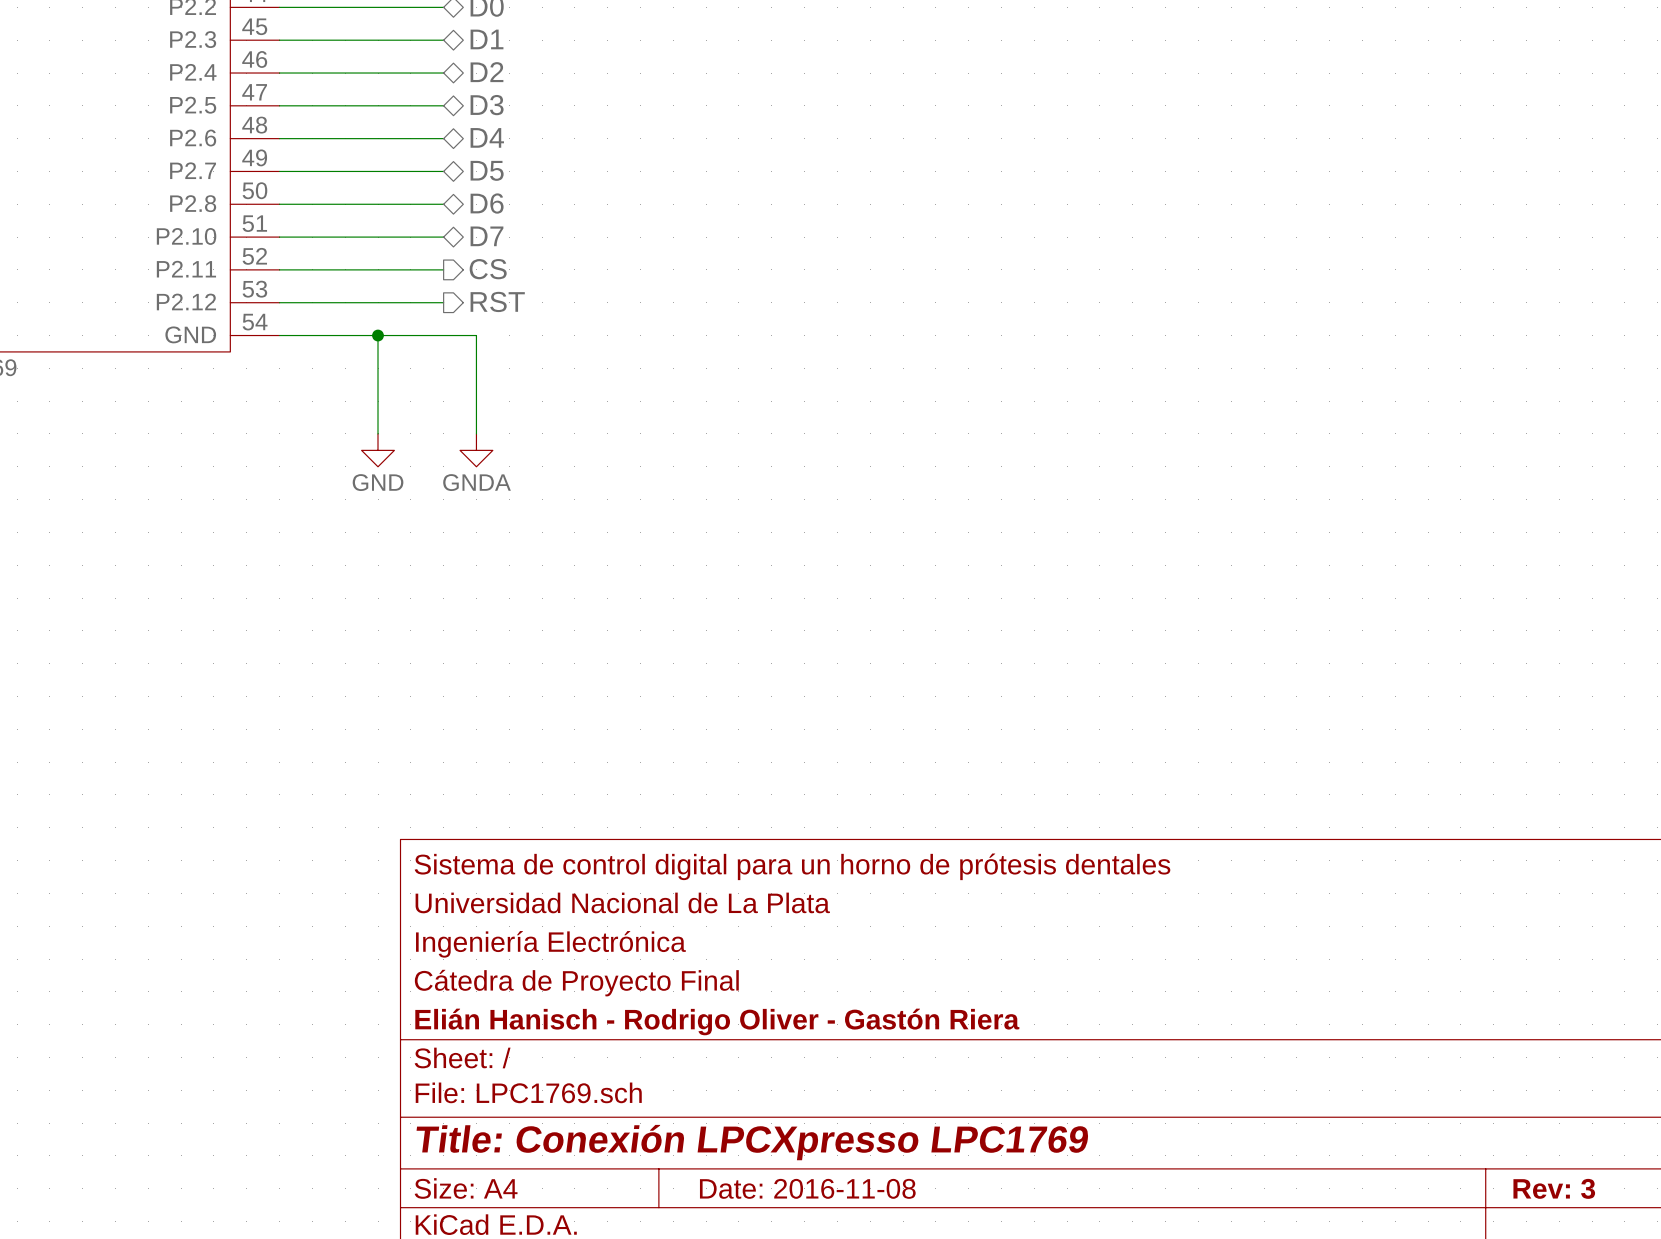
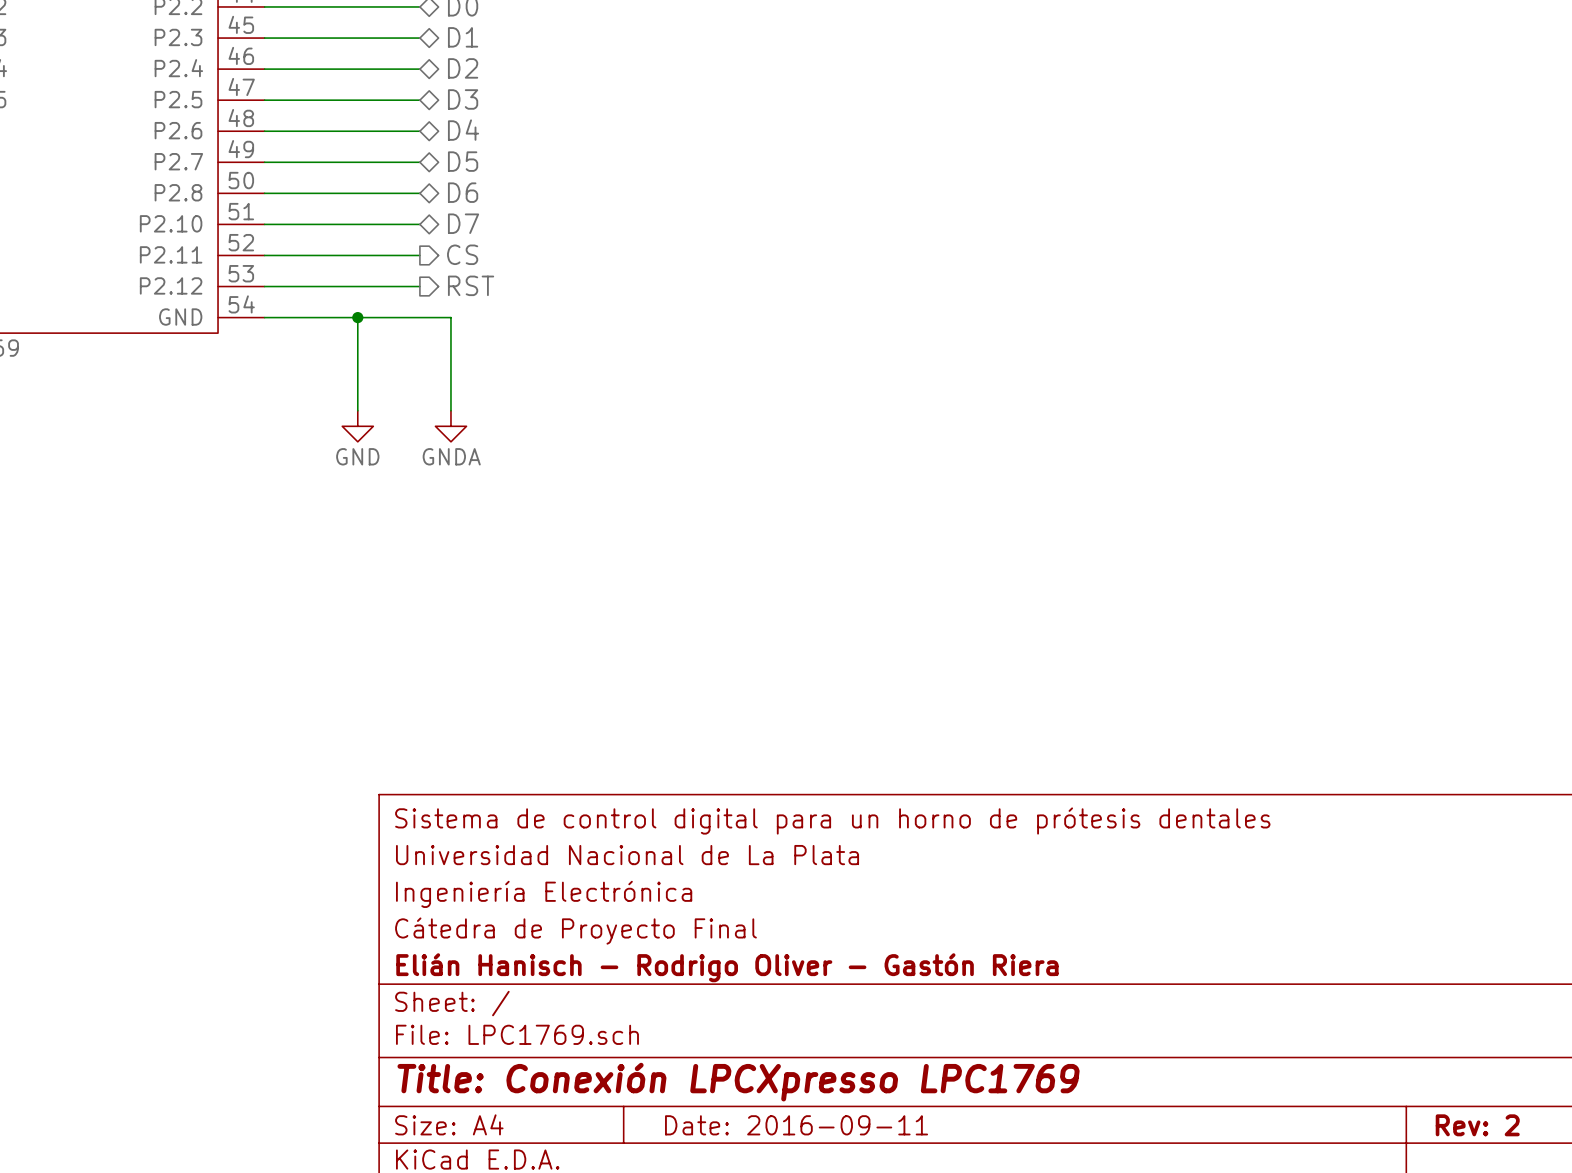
title block: Date: 2016-11-08 (807, 1188) -> Date: 2016-09-11 (796, 1125)
title block: Rev: 3 (1554, 1188) -> Rev: 2 (1477, 1125)

